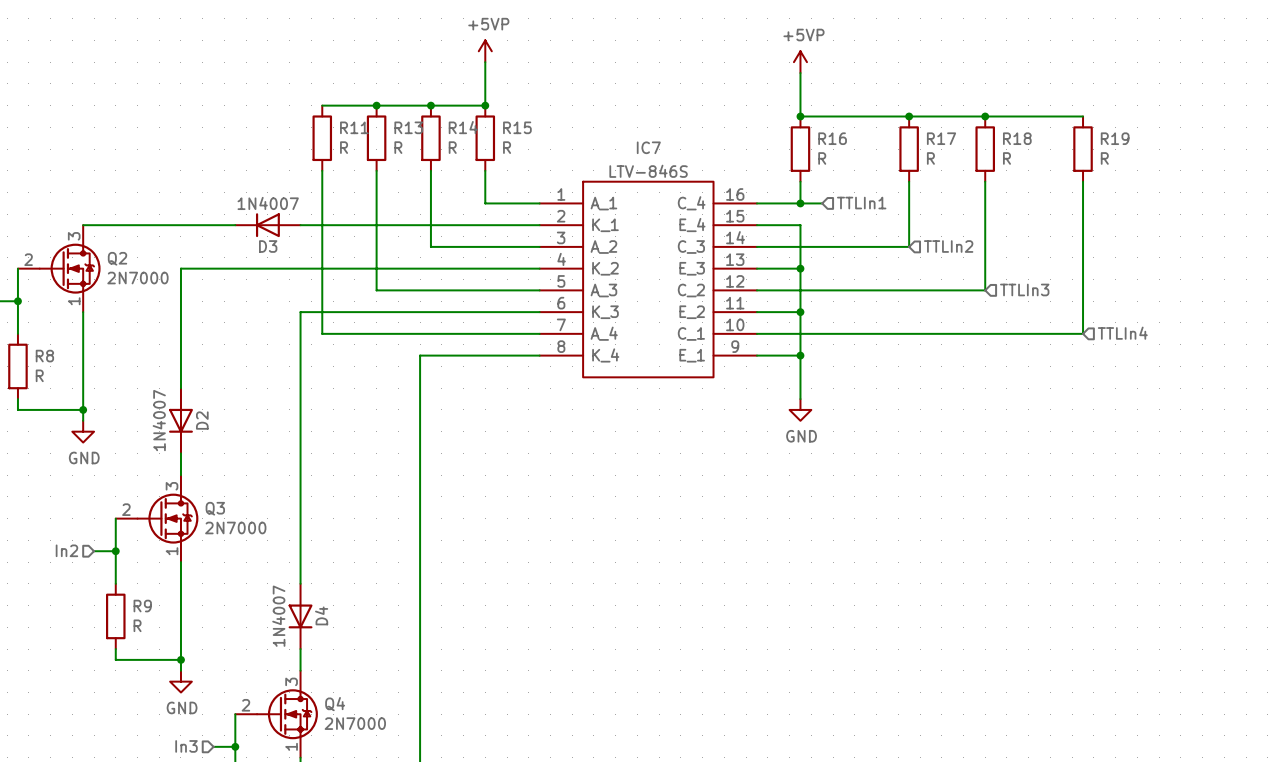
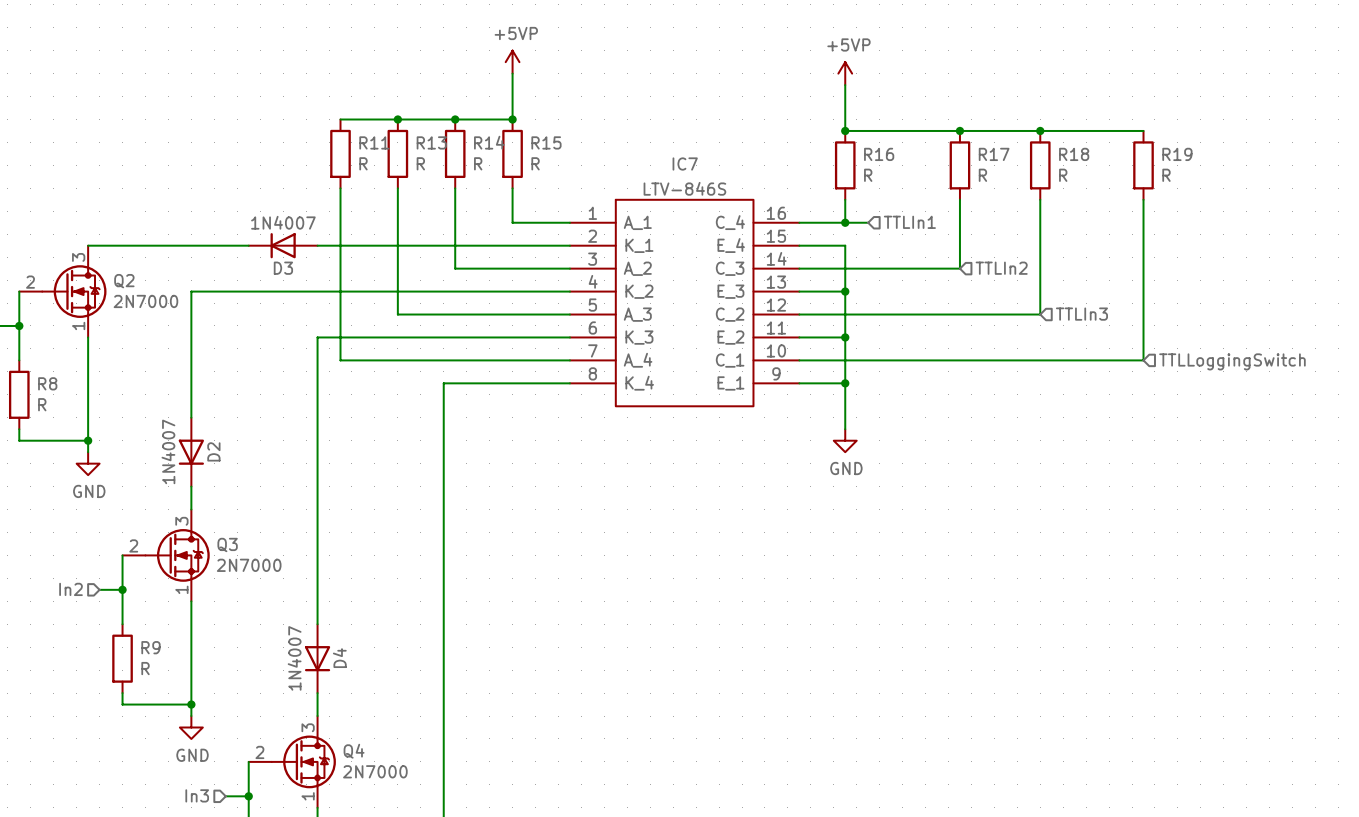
hierarchical label: TTLIn4 (1122, 333) -> TTLLoggingSwitch (1232, 361)

